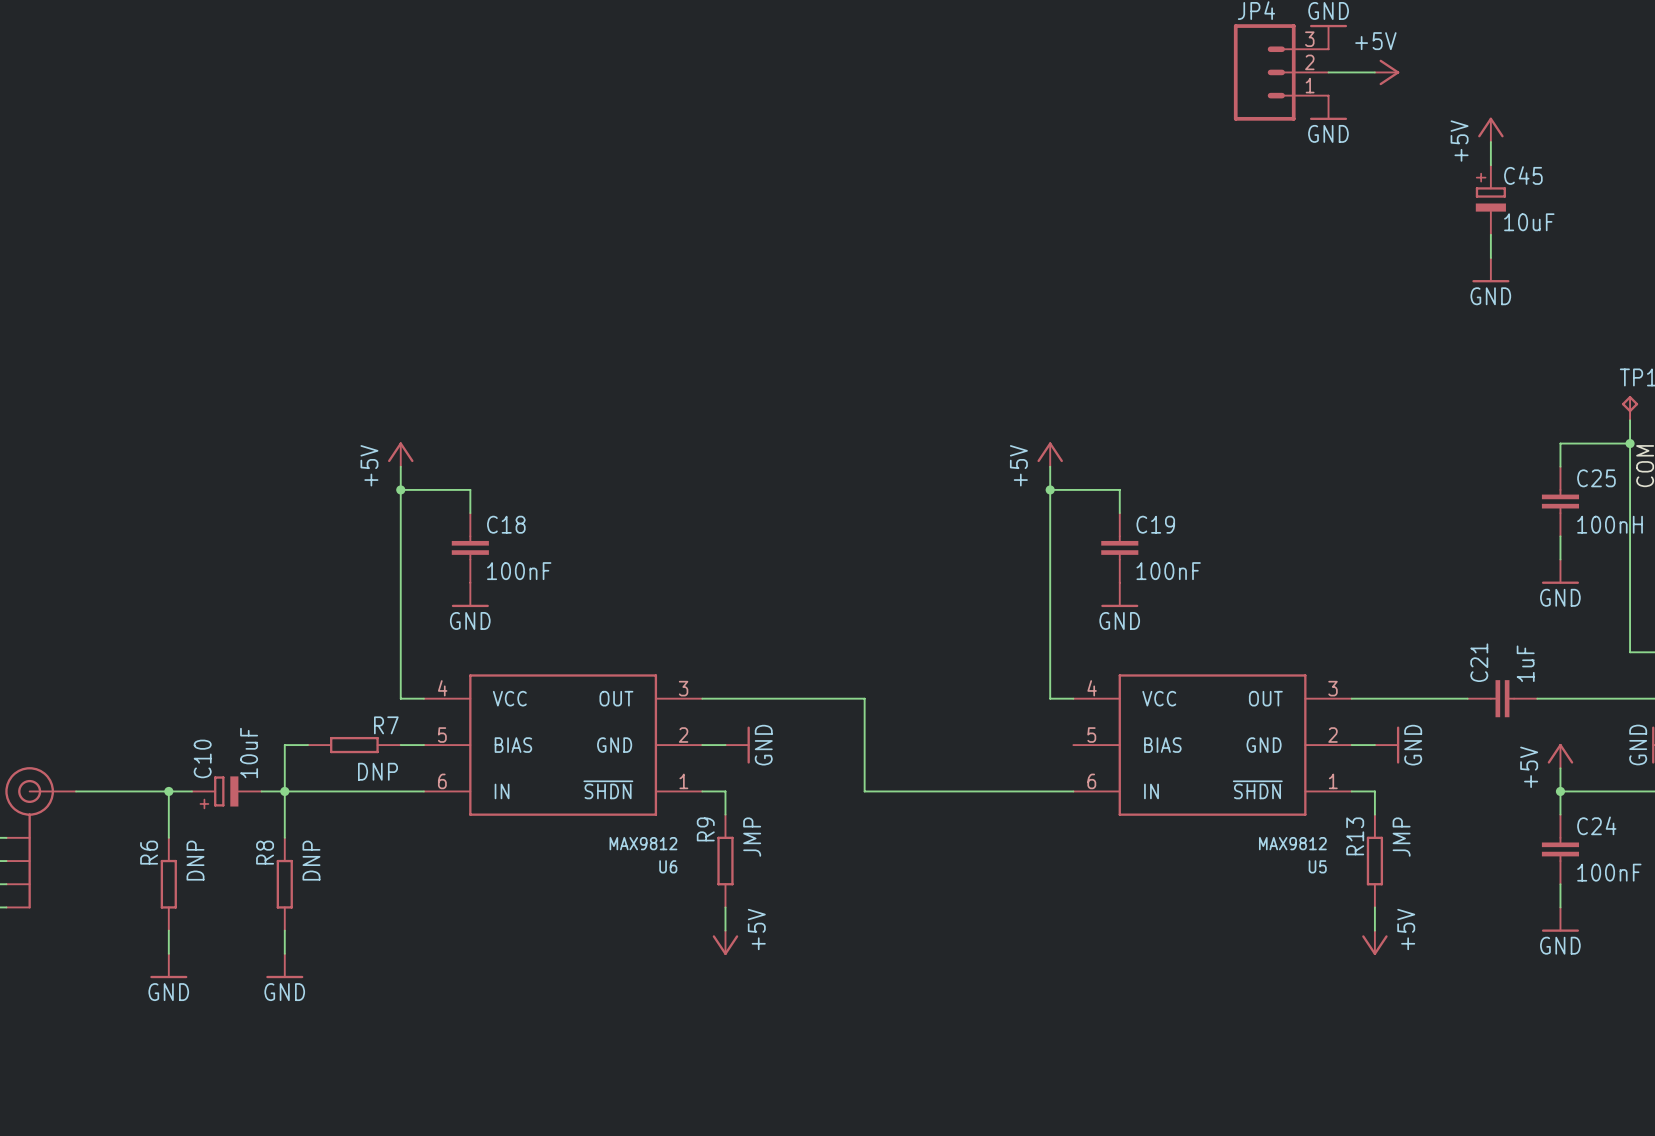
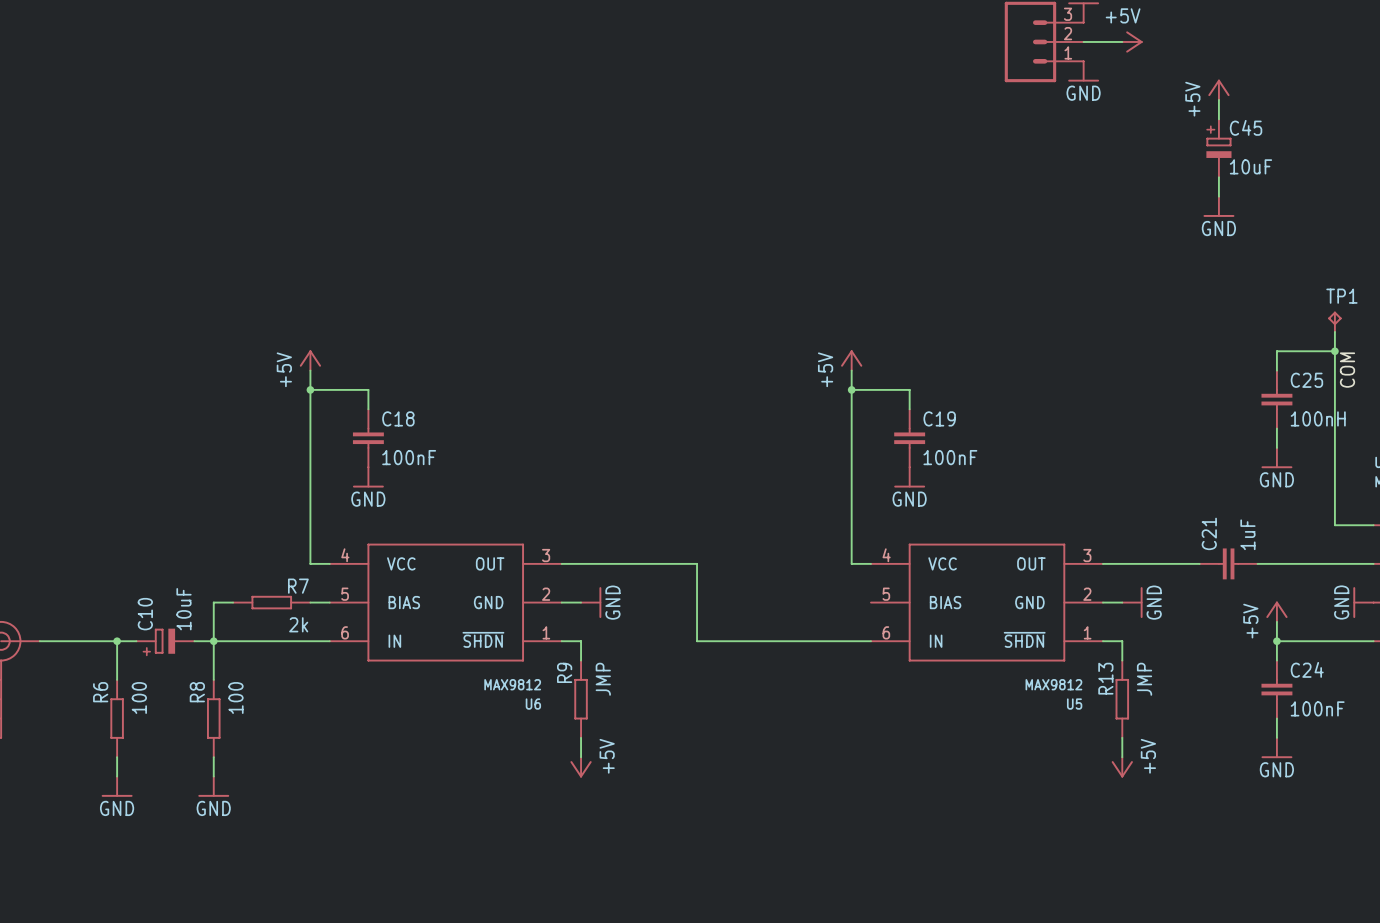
R7 value: DNP (377, 771) -> 2k (298, 624)
R6 value: DNP (195, 860) -> 100 (139, 698)
R8 value: DNP (311, 860) -> 100 (235, 698)

